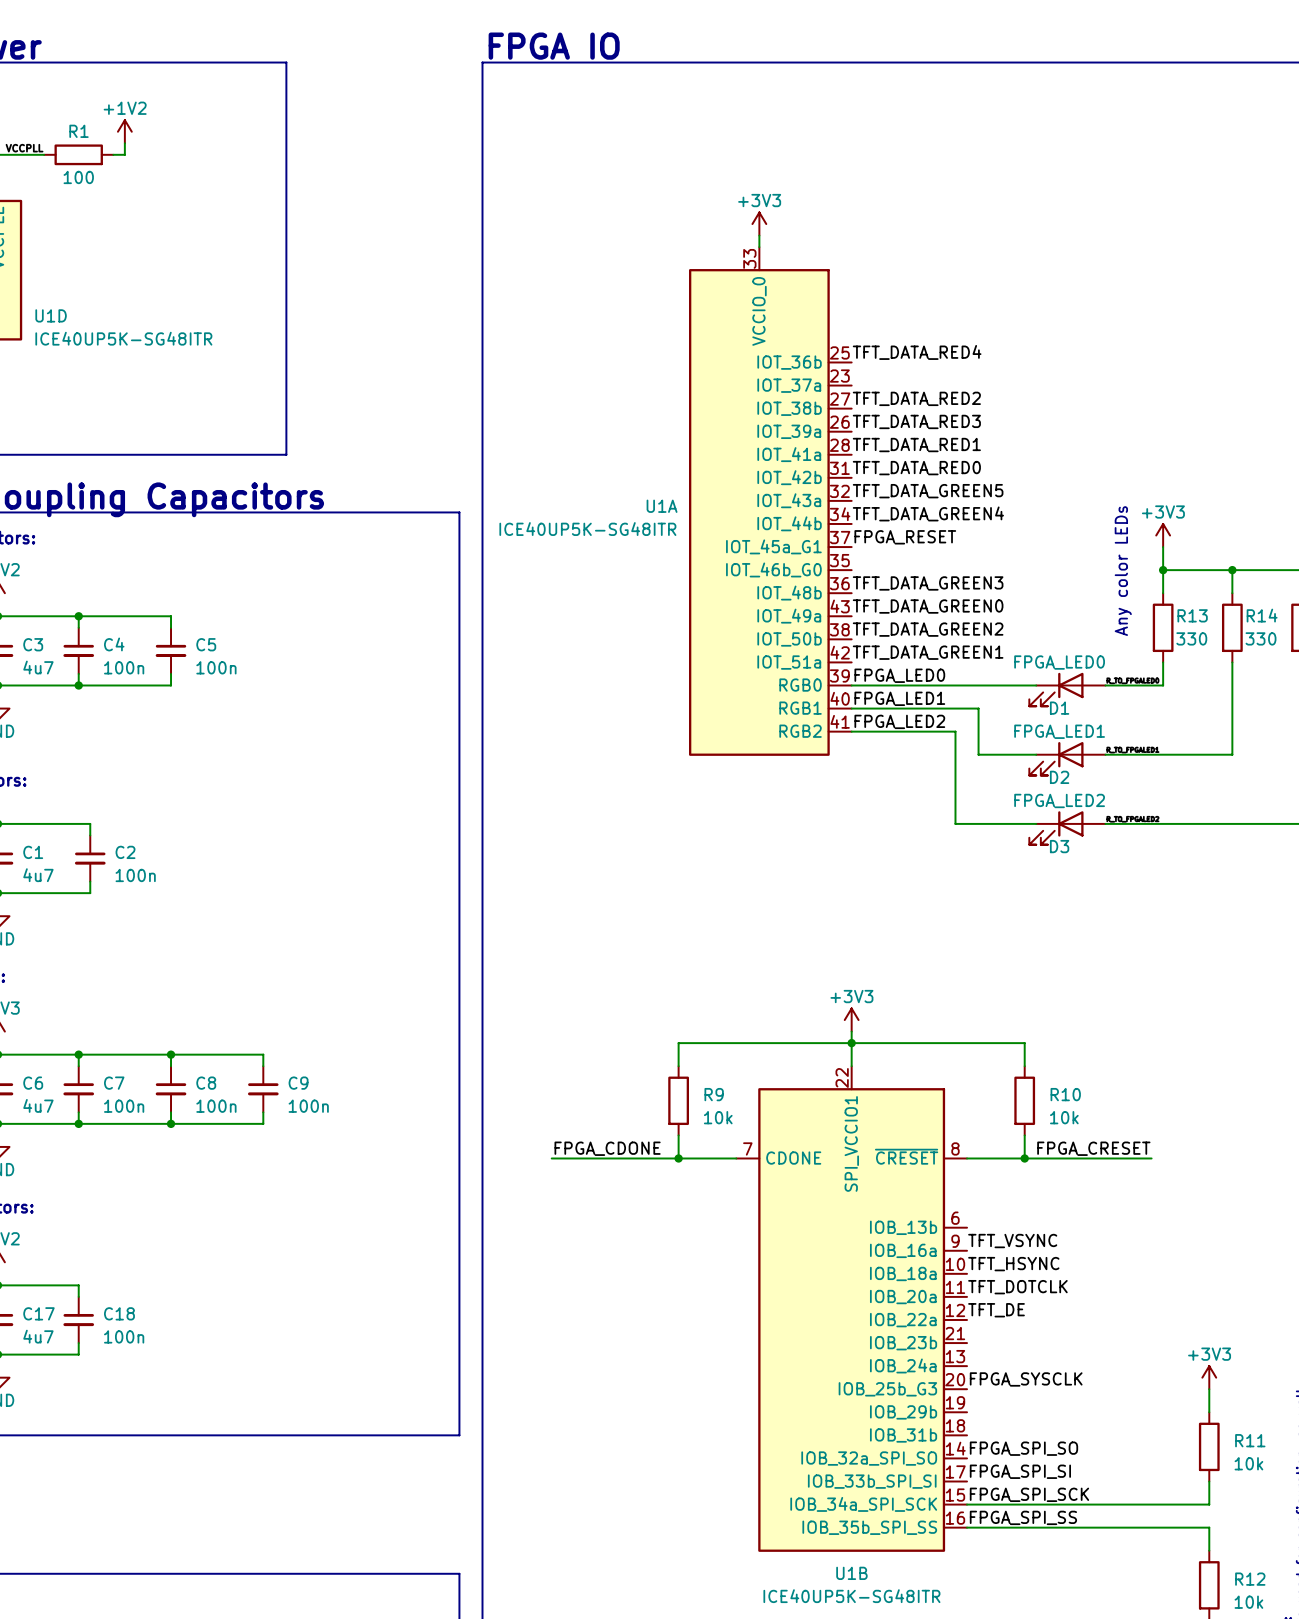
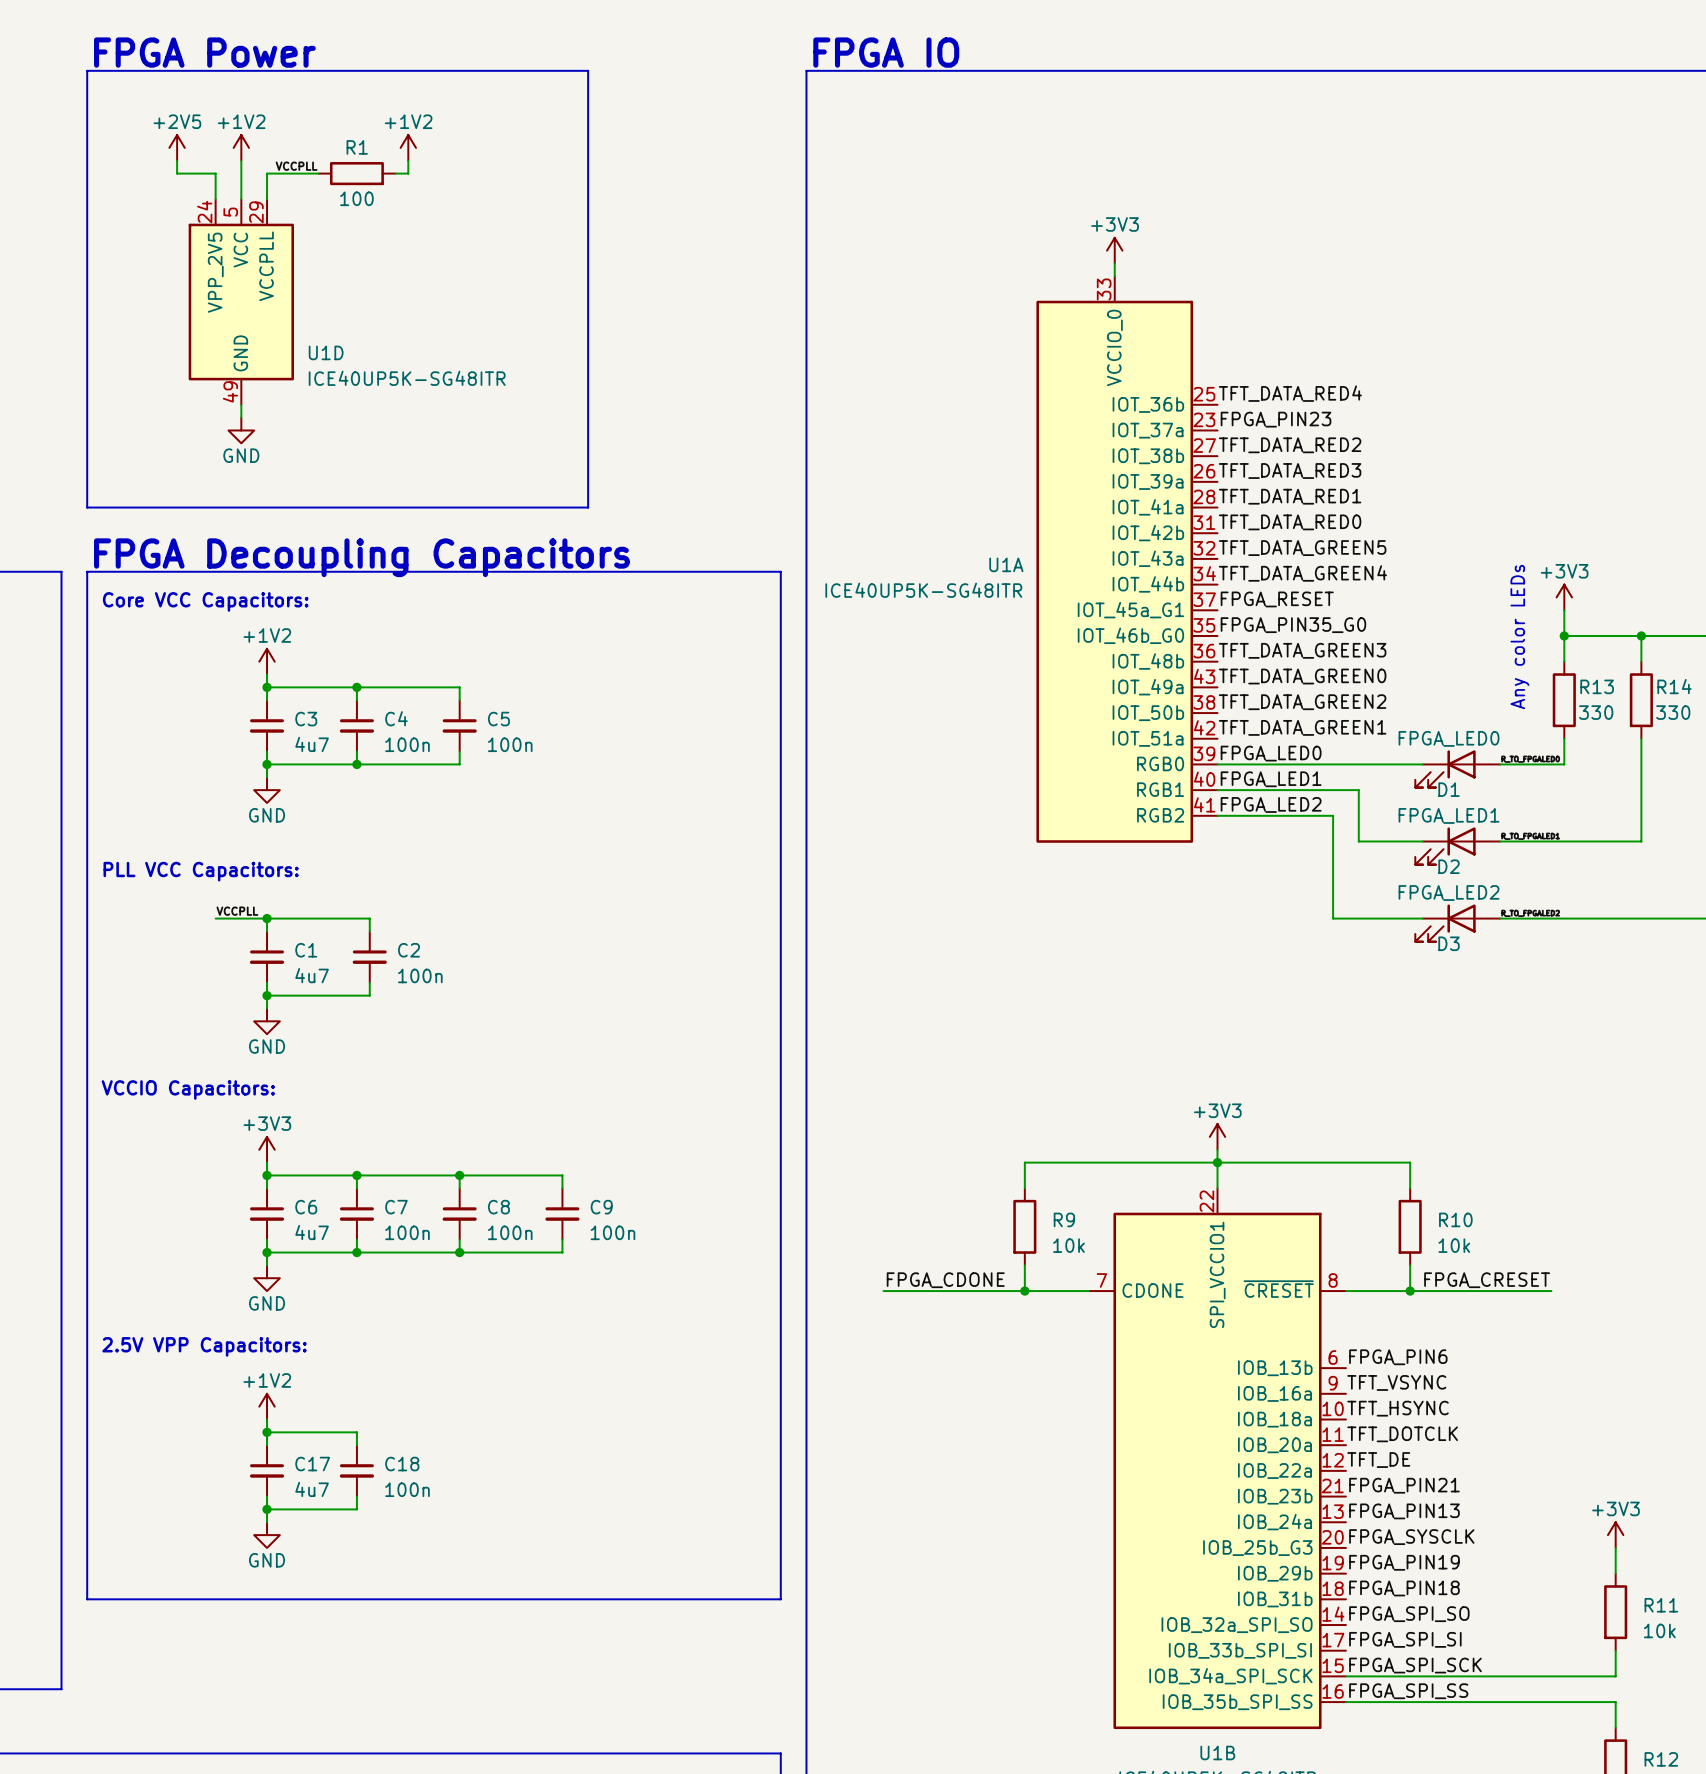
label: none -> FPGA_PIN23 (1276, 419)
label: none -> FPGA_PIN35_G0 (1293, 625)
label: none -> FPGA_PIN6 (1398, 1357)
label: none -> FPGA_PIN21 (1404, 1485)
label: none -> FPGA_PIN13 (1404, 1511)
label: none -> FPGA_PIN19 (1404, 1562)
label: none -> FPGA_PIN18 (1404, 1588)

